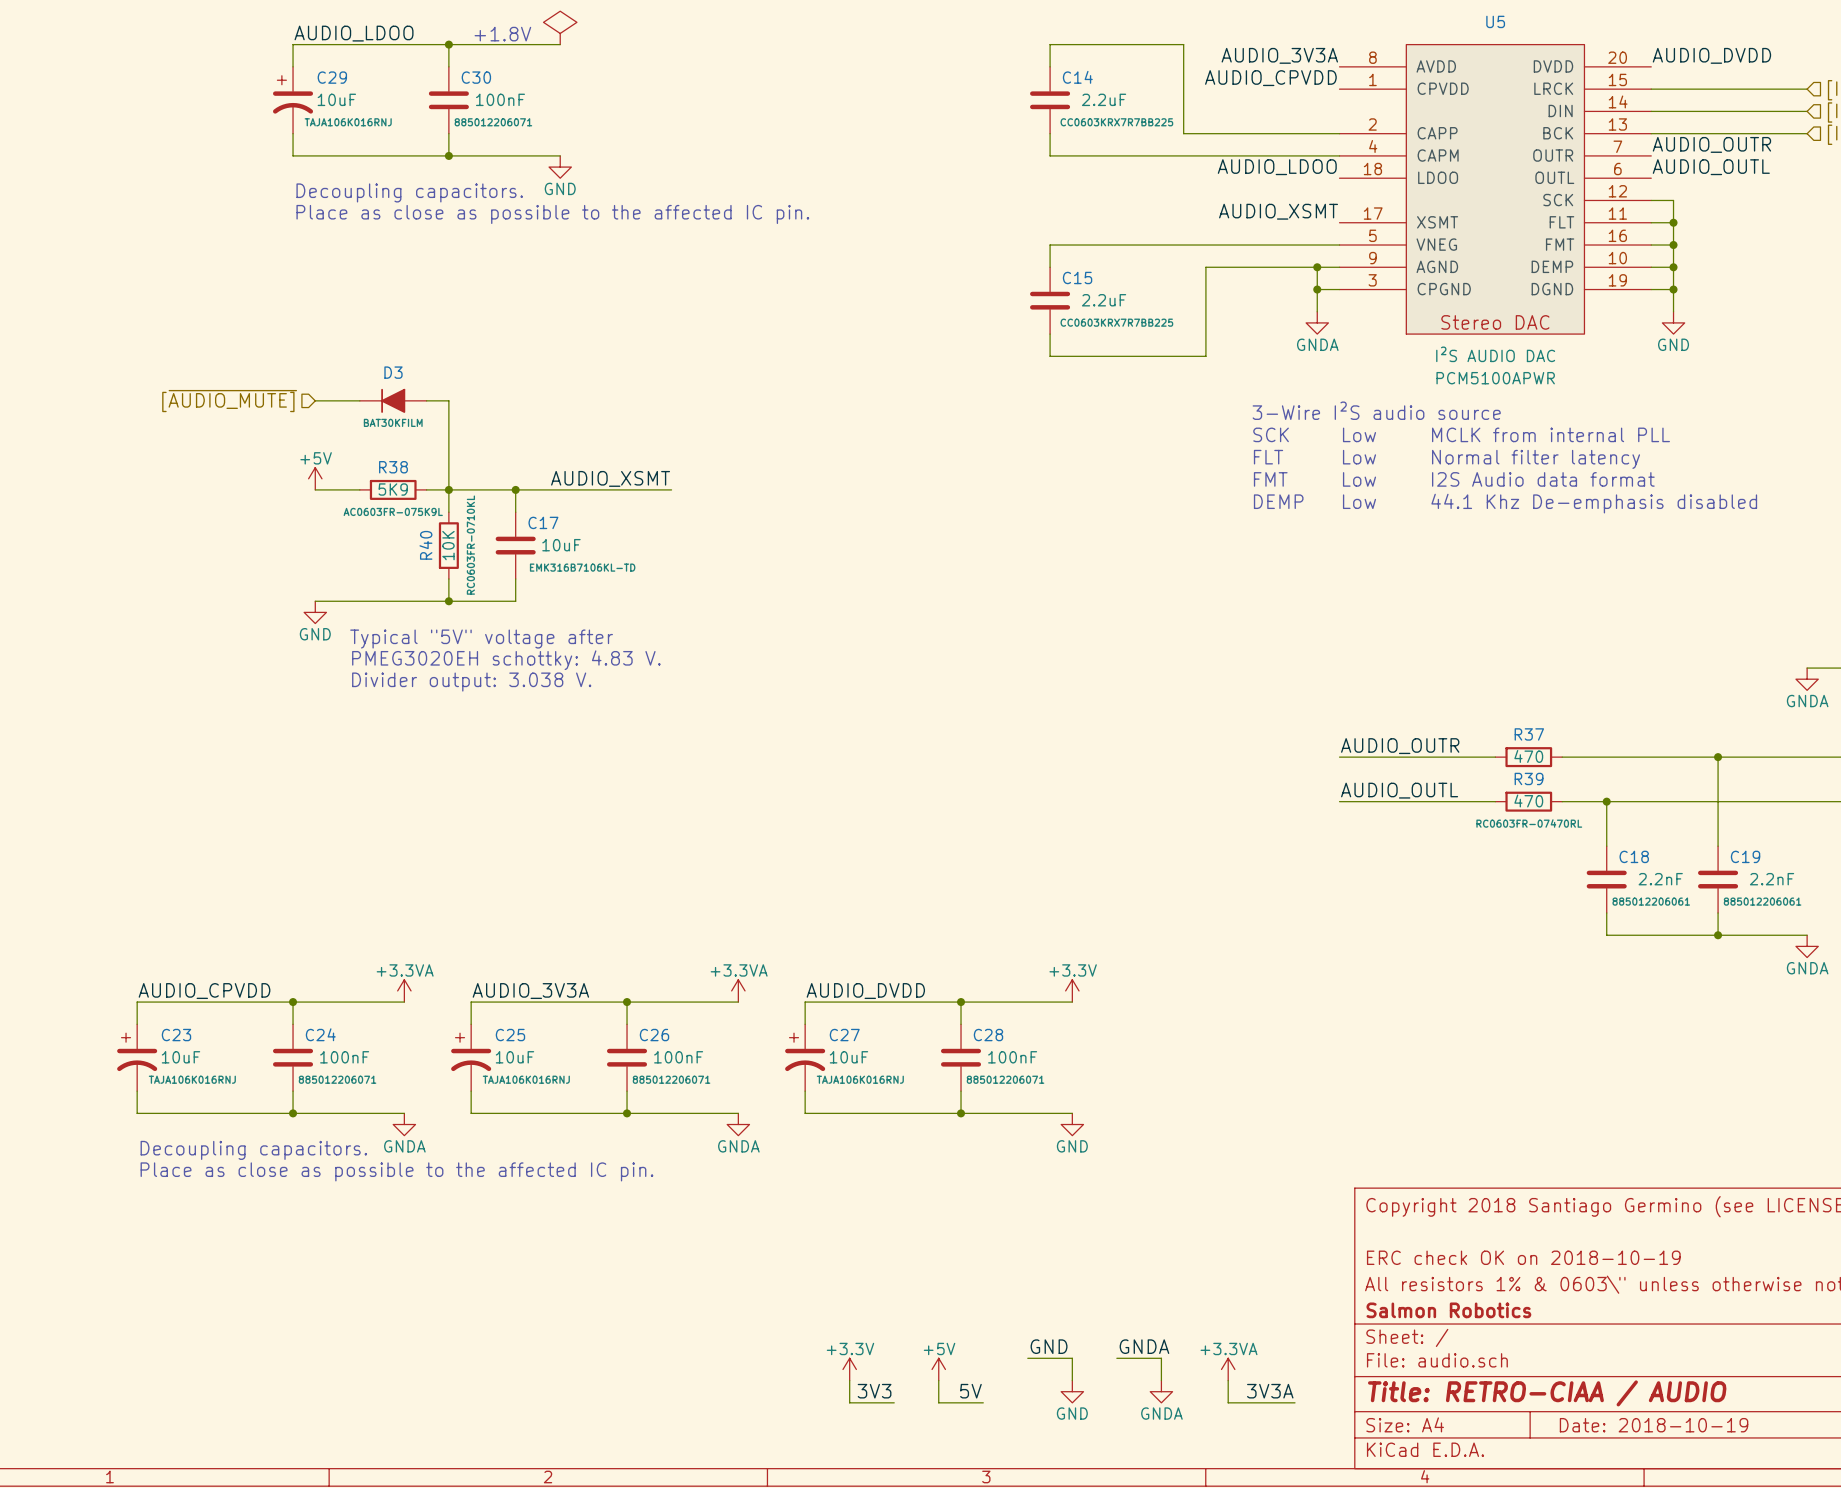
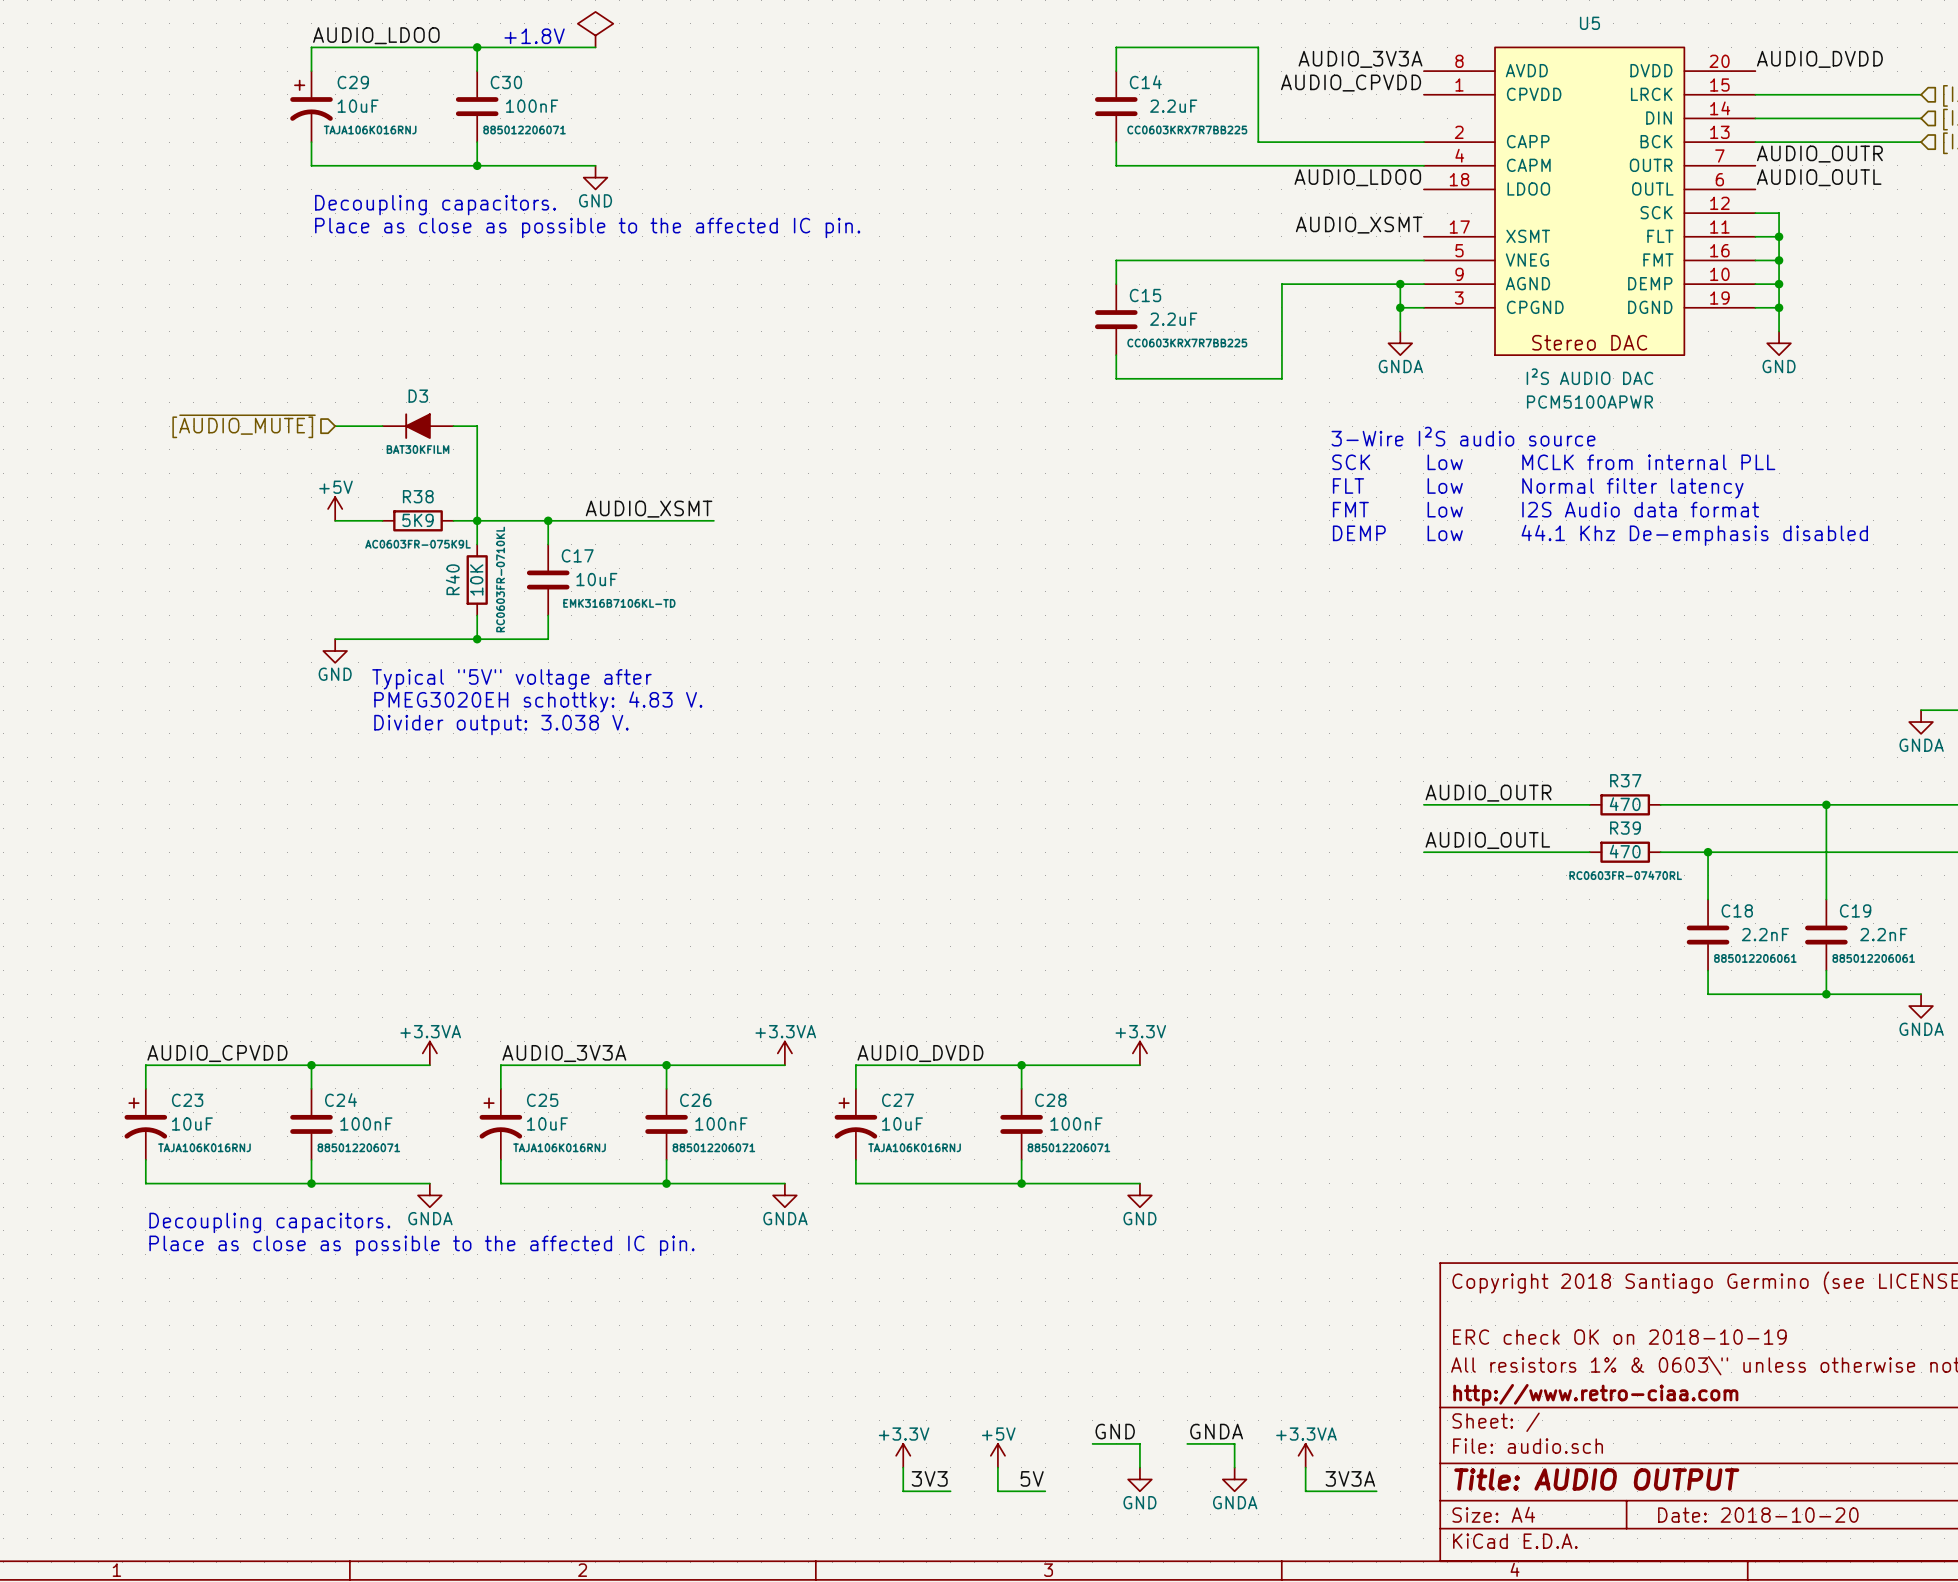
title block: Salmon Robotics (1448, 1310) -> http://www.retro-ciaa.com (1595, 1394)
title block: Title: RETRO-CIAA / AUDIO (1547, 1393) -> Title: AUDIO OUTPUT (1596, 1479)
title block: Date: 2018-10-19 (1654, 1425) -> Date: 2018-10-20 (1758, 1515)

